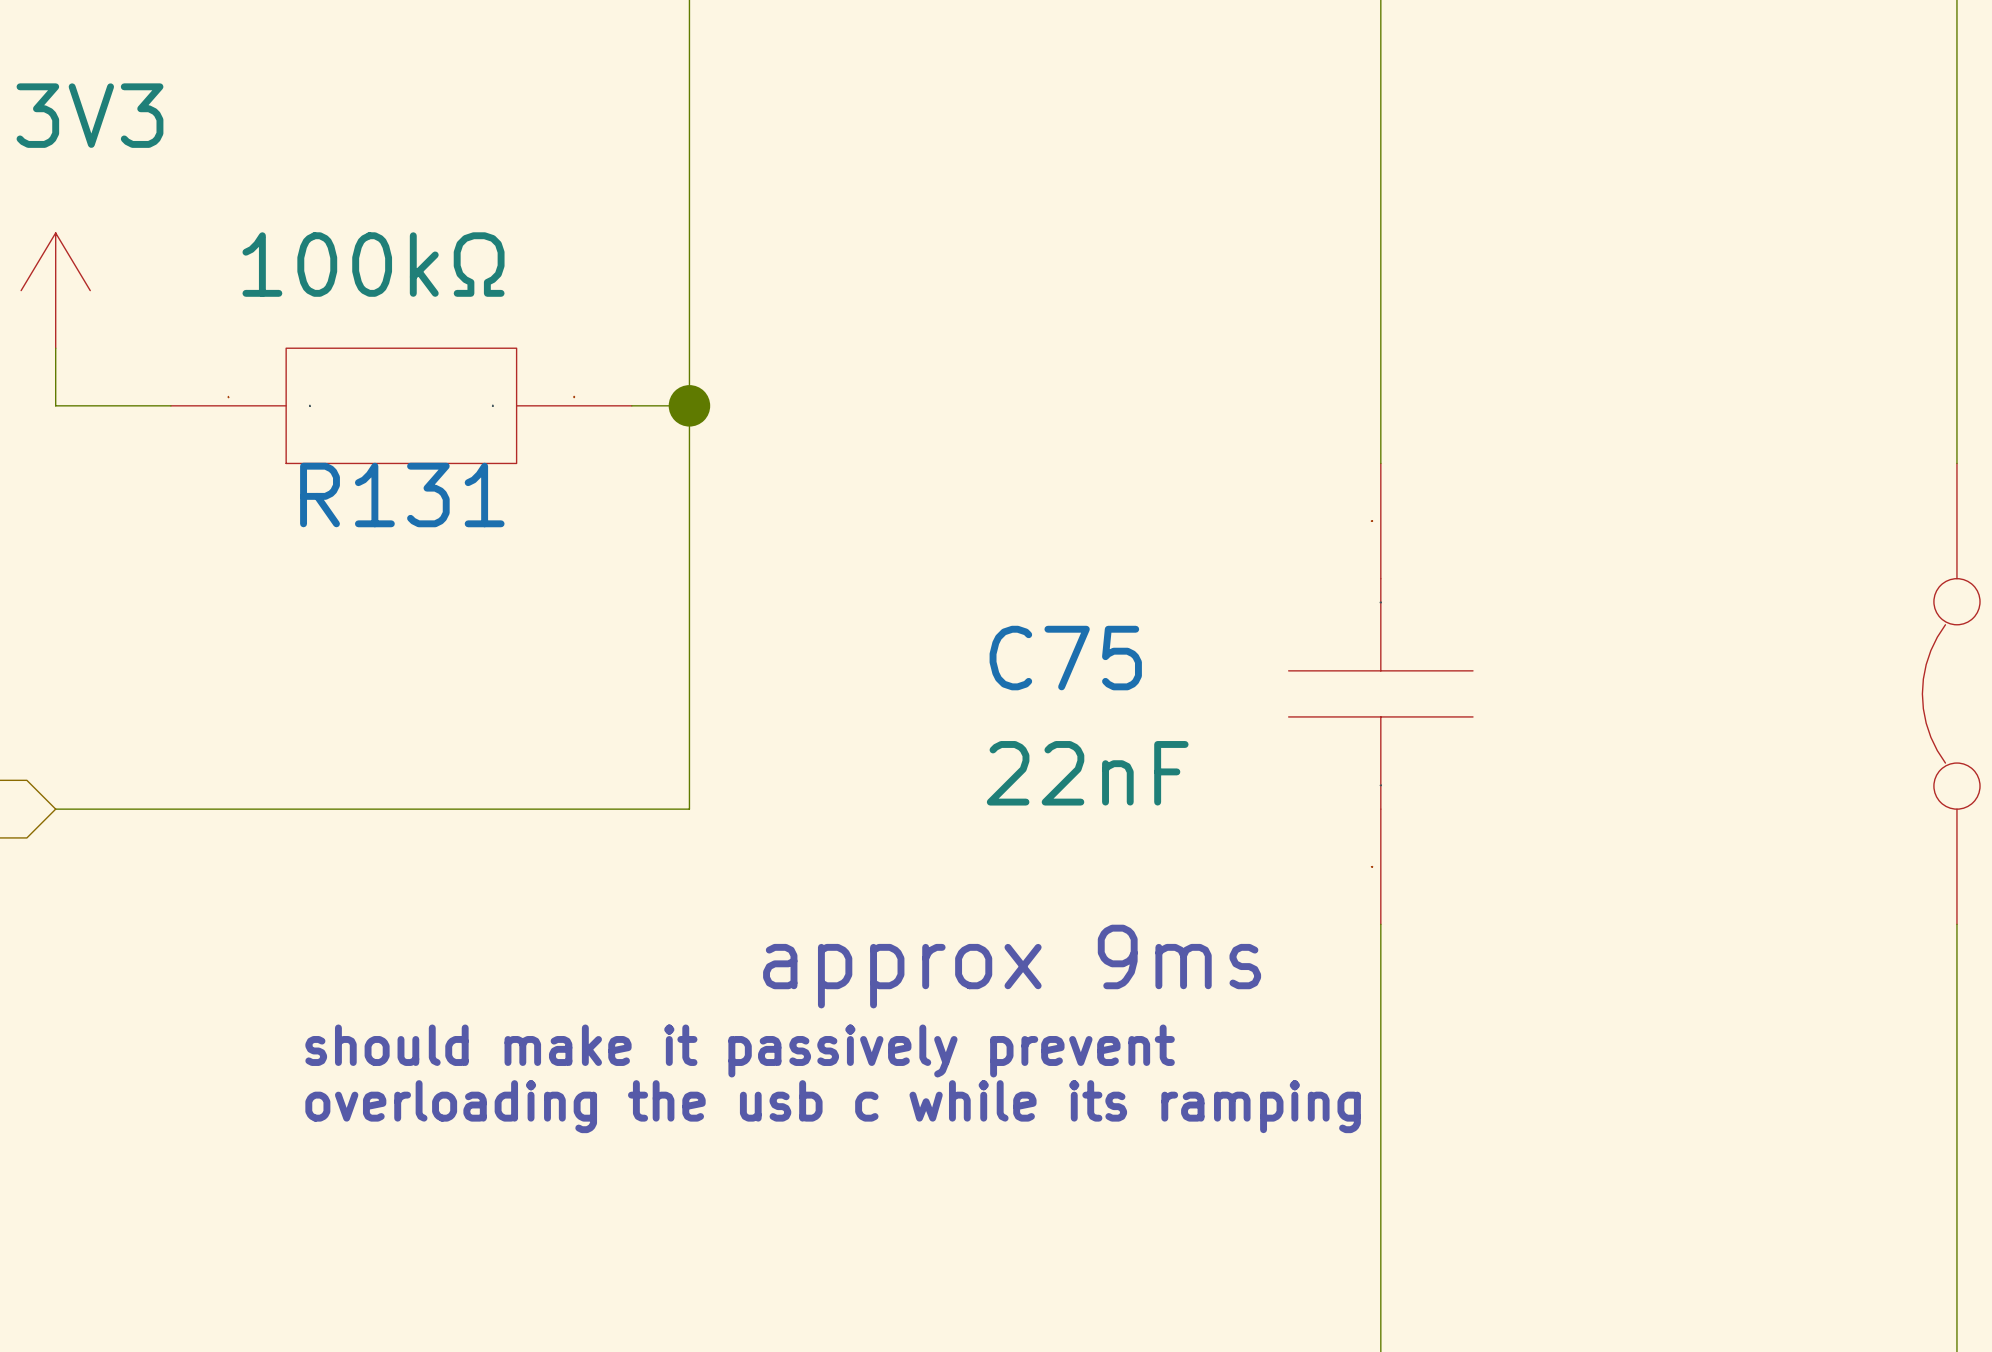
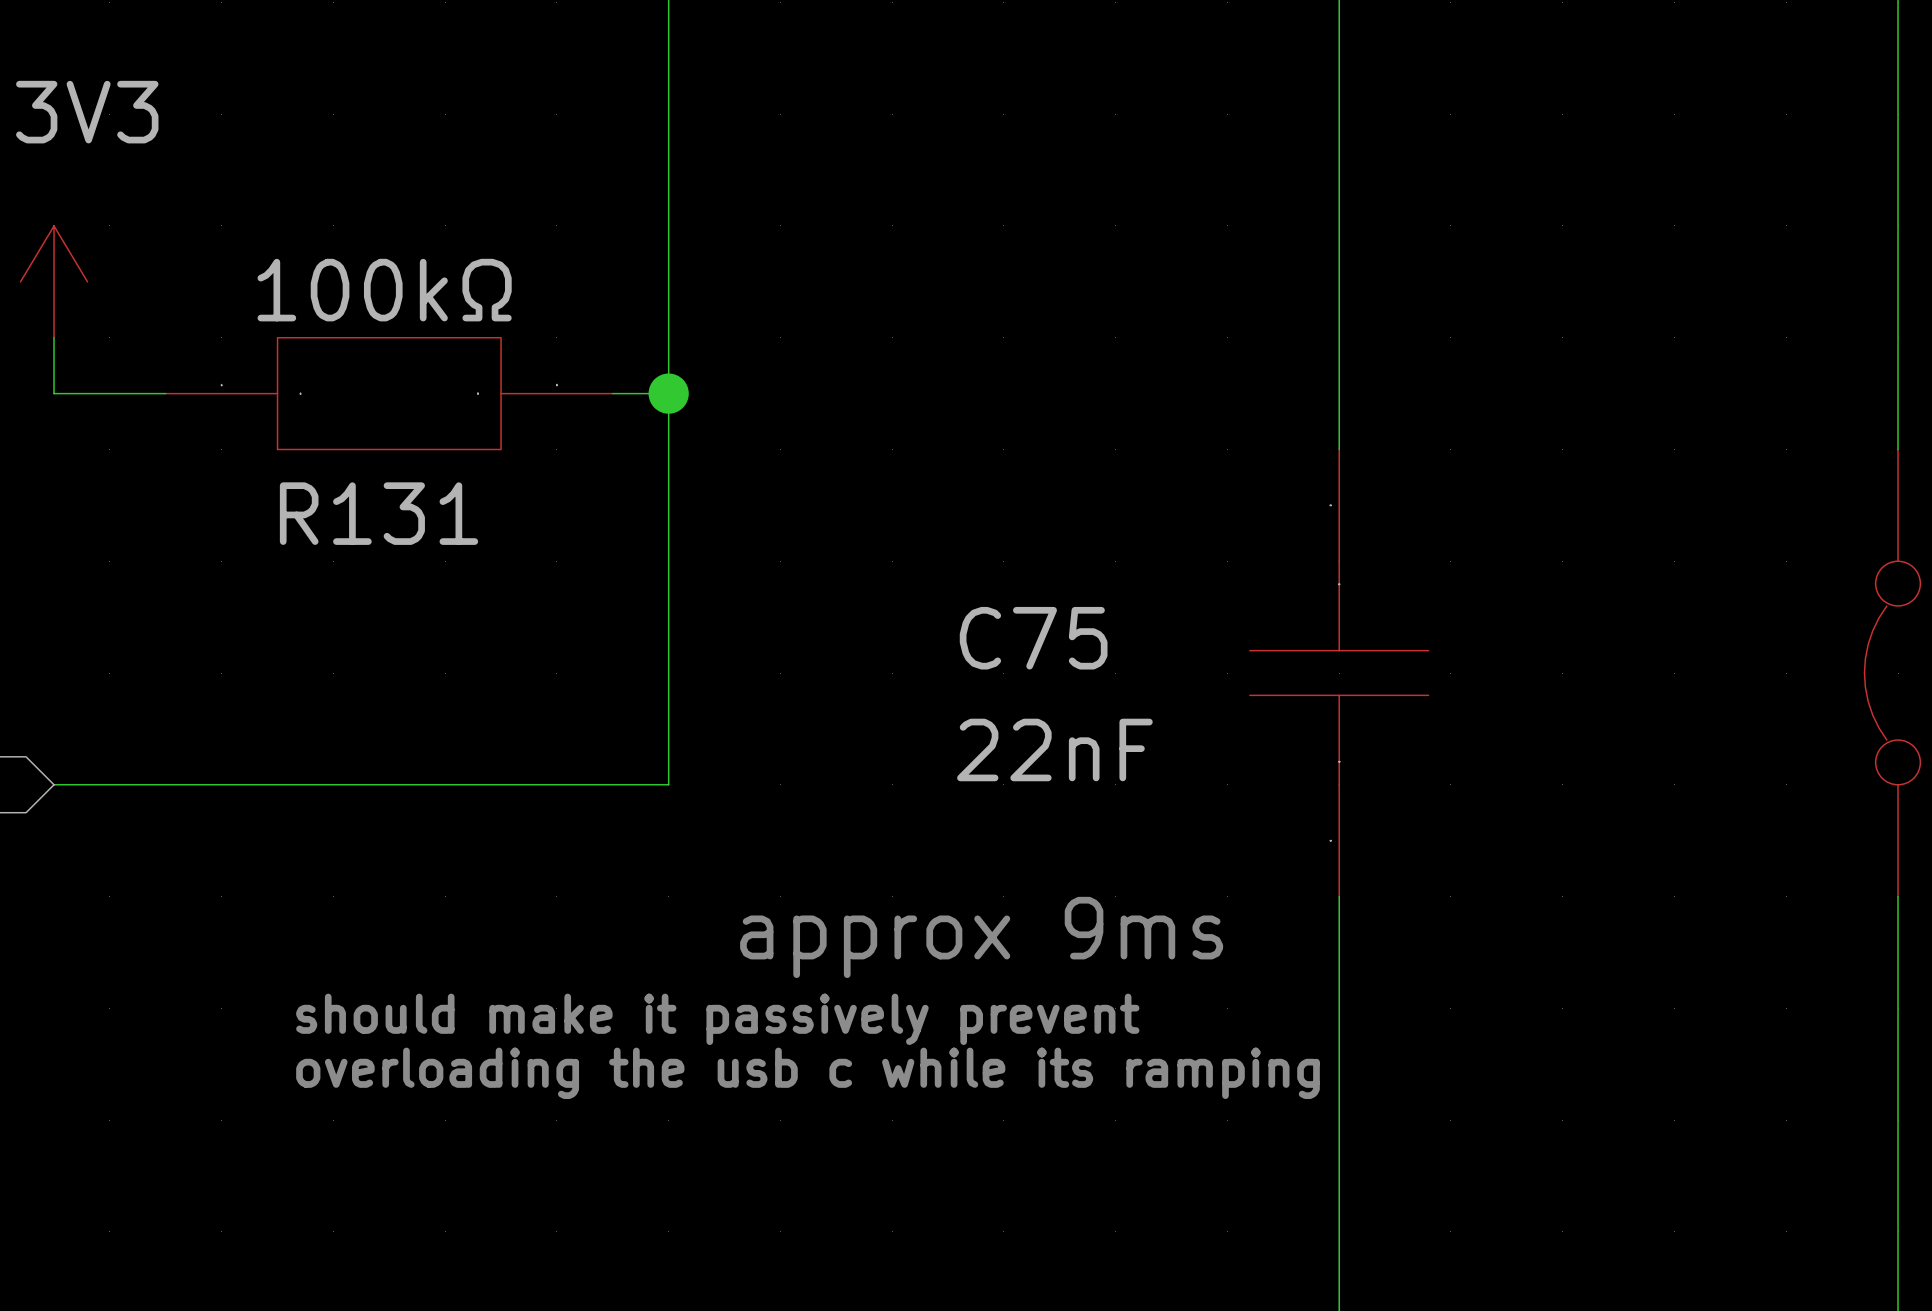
R131 value position: 100kΩ (373, 264) -> 100kΩ (384, 290)
R131 name position: R131 (402, 495) -> R131 (379, 513)

